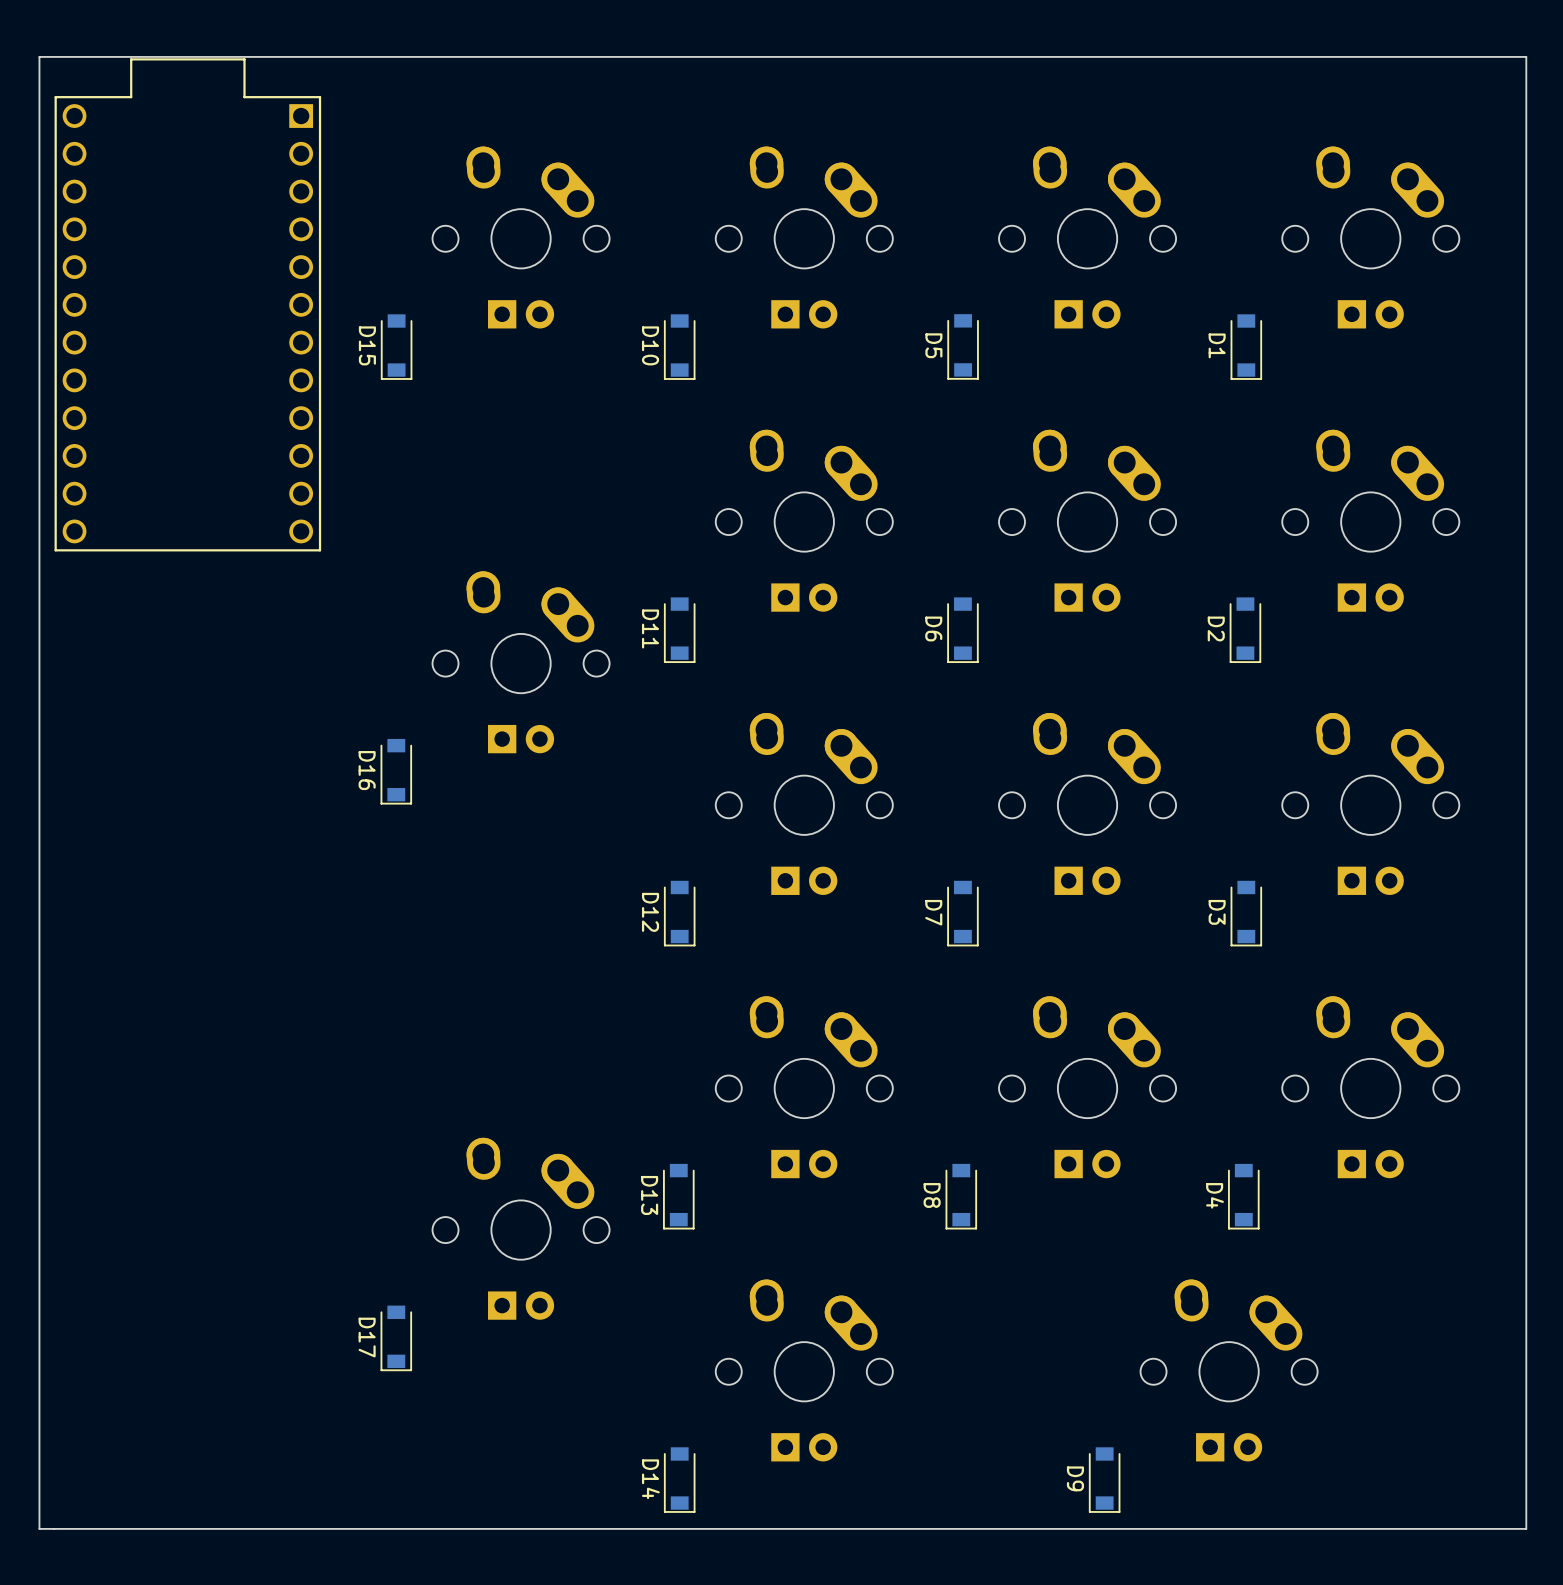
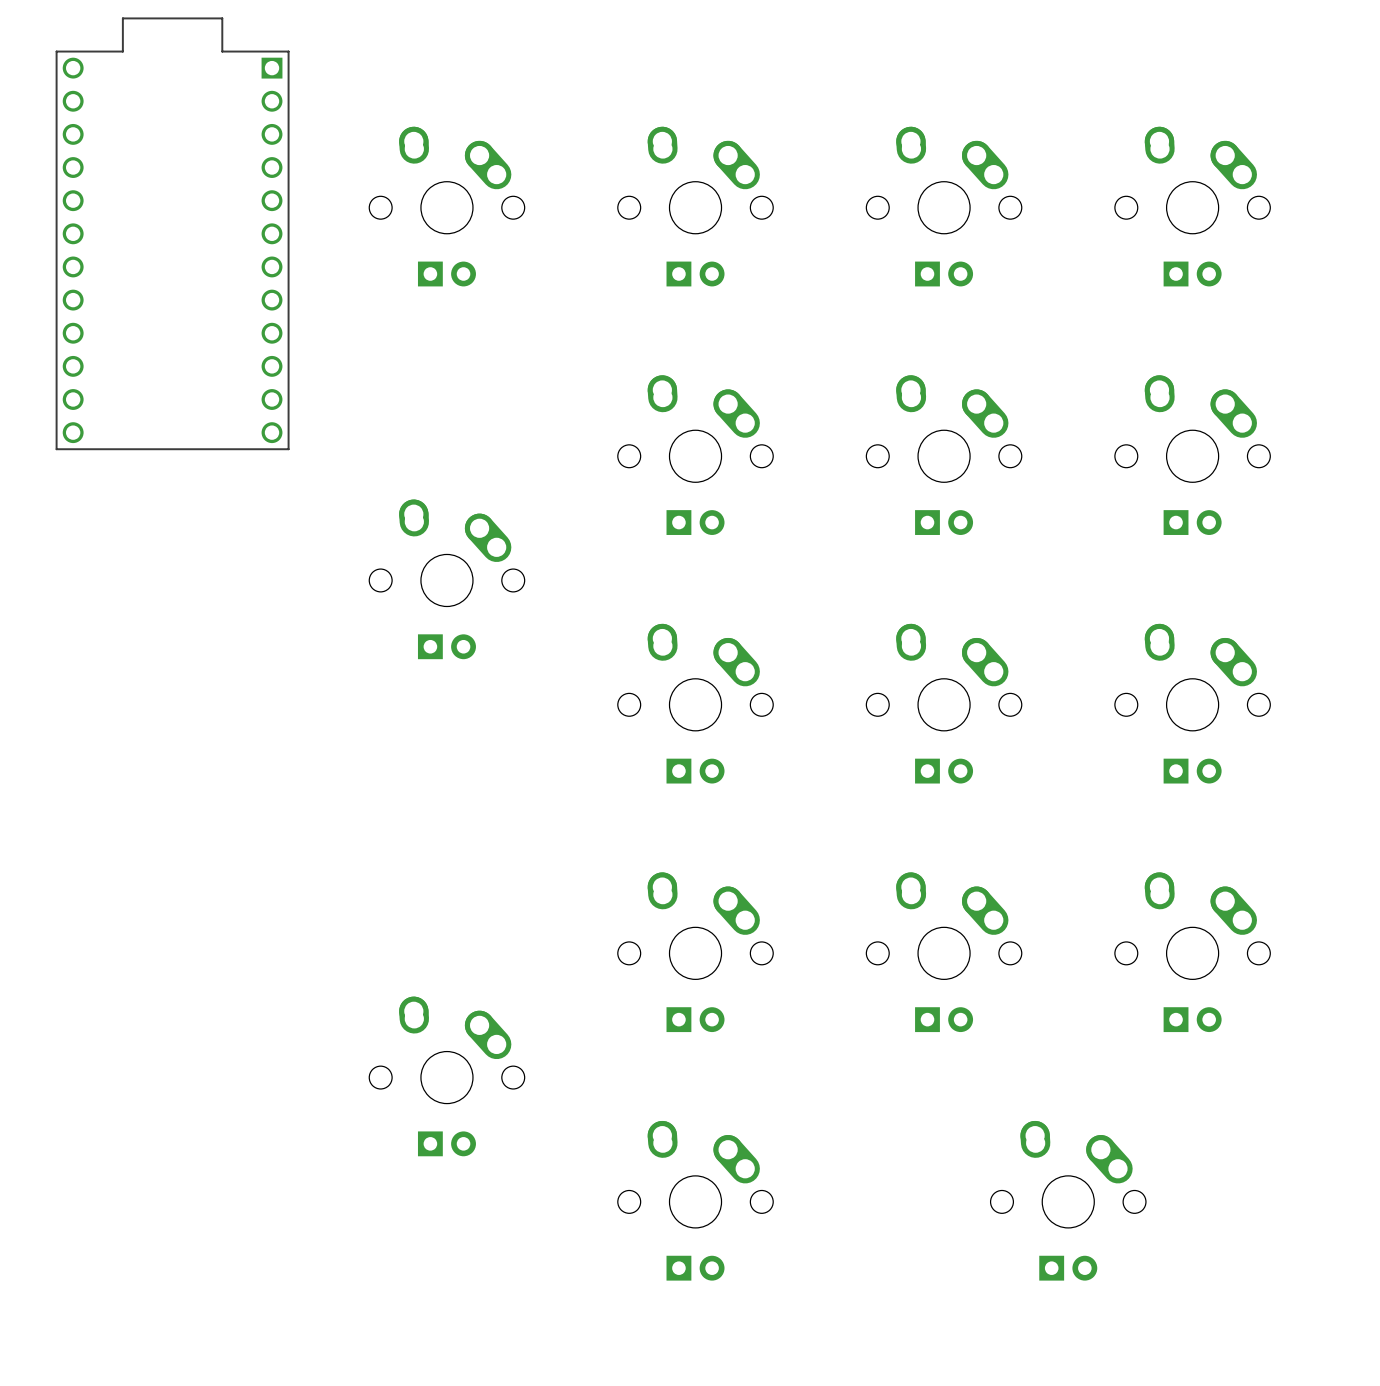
board edge: (1526, 56) (1526, 1528) (39, 1528) (39, 56) (1526, 56) -> none
part position: (187, 304) -> (172, 233)
D5: (963, 346) -> none
D15: (396, 347) -> none
D10: (679, 347) -> none
D1: (1246, 347) -> none
D11: (679, 630) -> none
D6: (962, 630) -> none
D2: (1245, 630) -> none
D16: (396, 771) -> none
D12: (679, 913) -> none
D7: (962, 913) -> none
D3: (1246, 913) -> none
D13: (678, 1196) -> none
D8: (961, 1196) -> none
D4: (1243, 1196) -> none
D17: (396, 1338) -> none
D14: (679, 1480) -> none
D9: (1104, 1480) -> none

